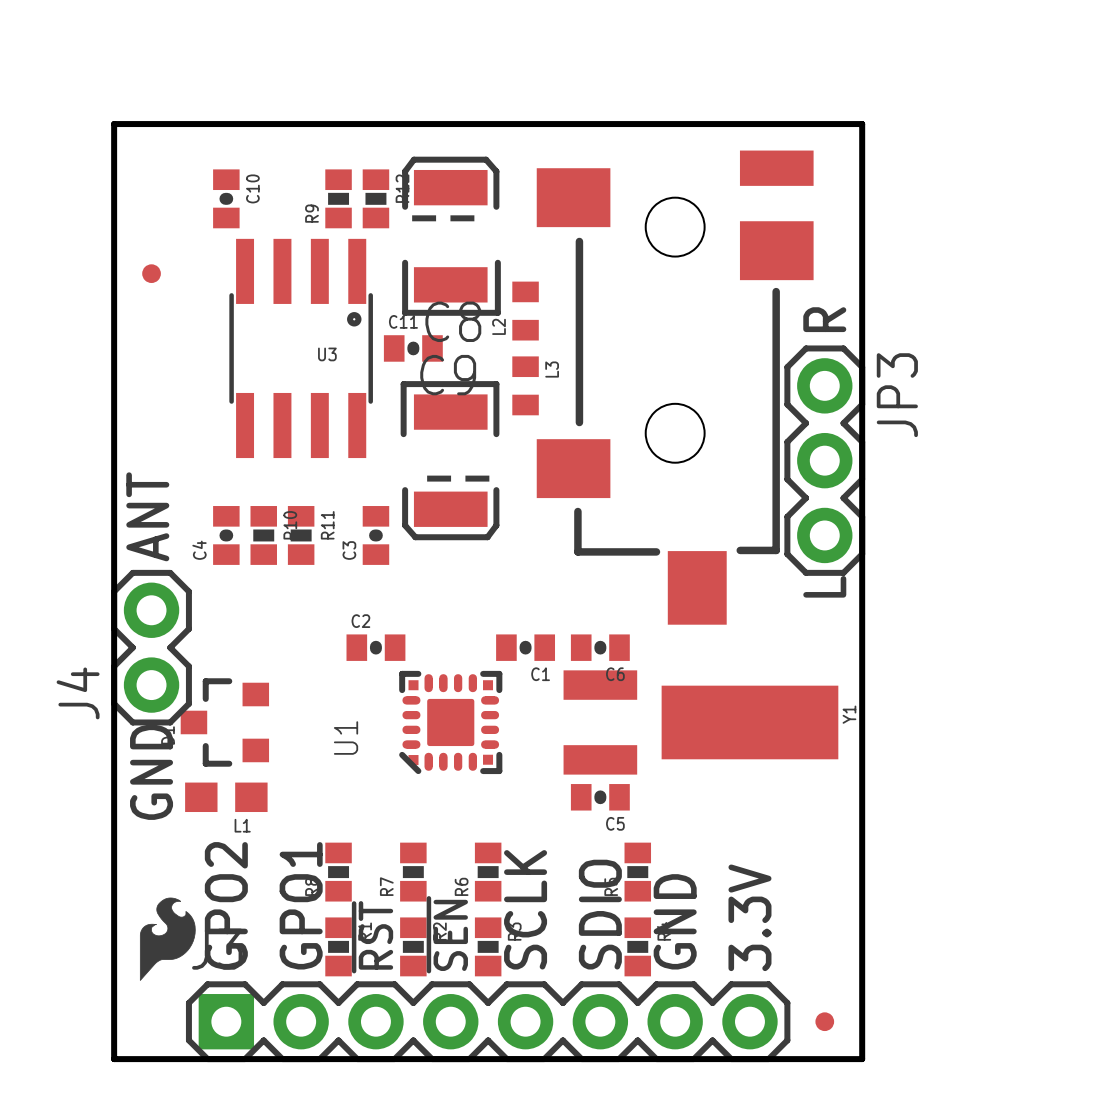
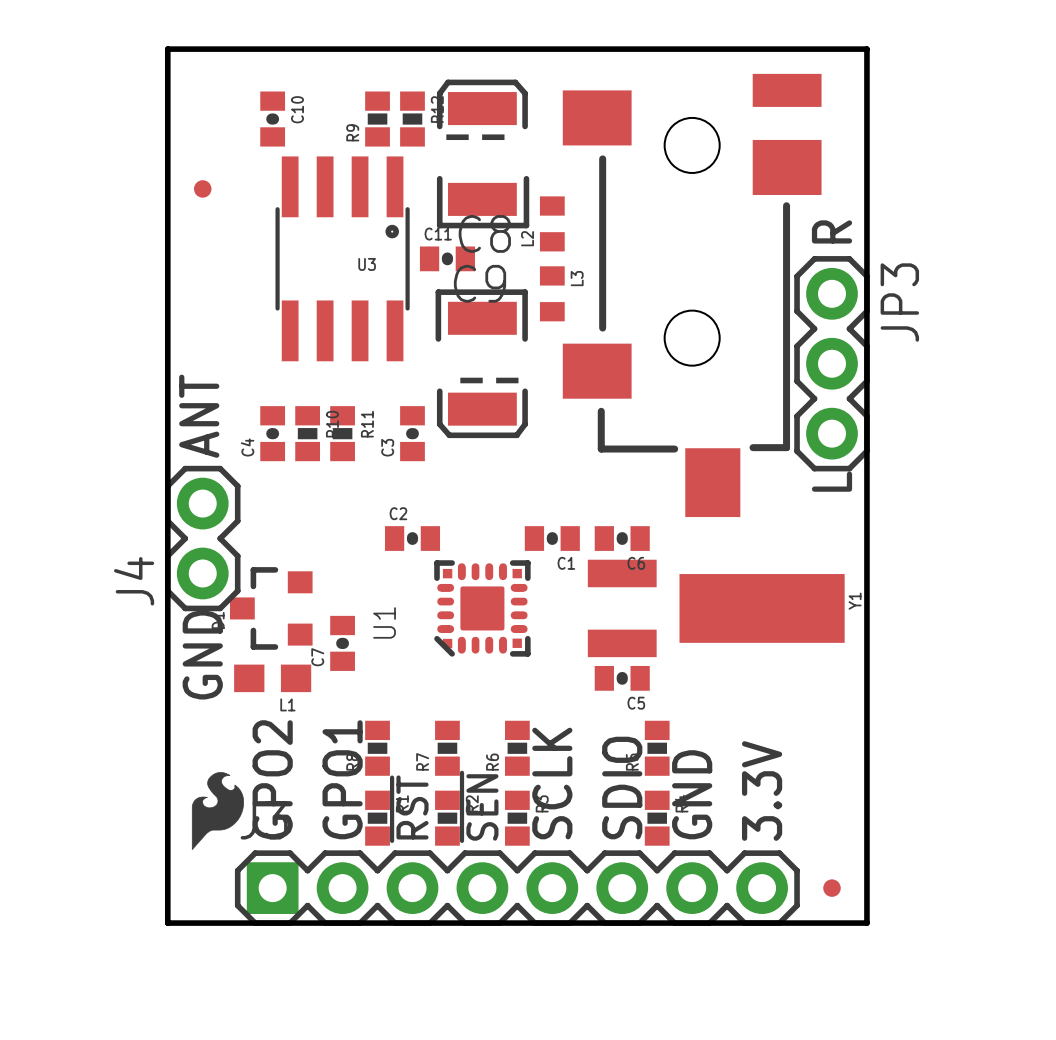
C7: none -> (342, 643)

